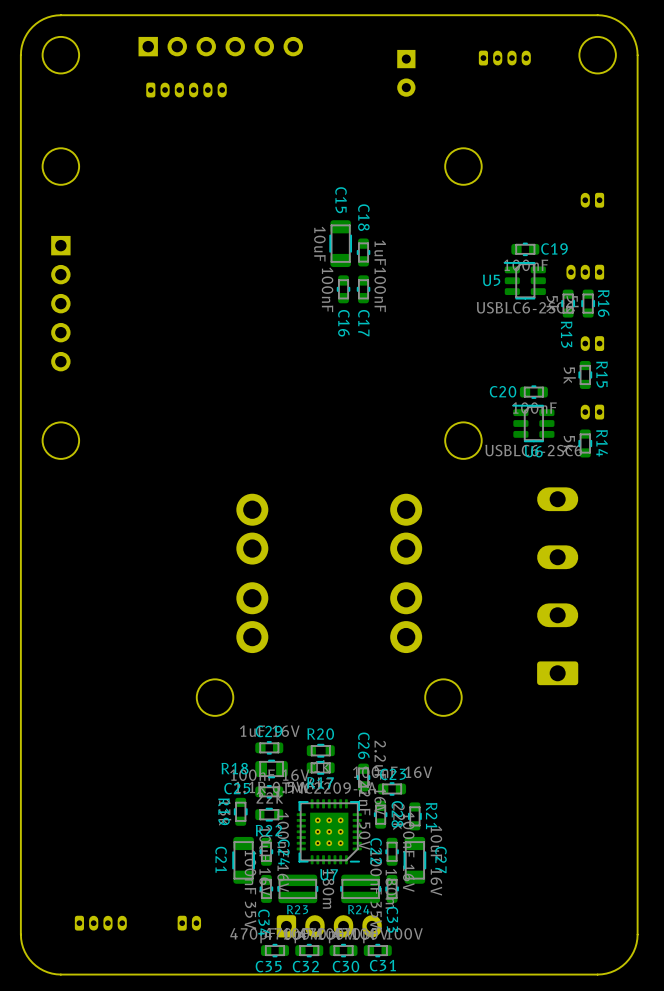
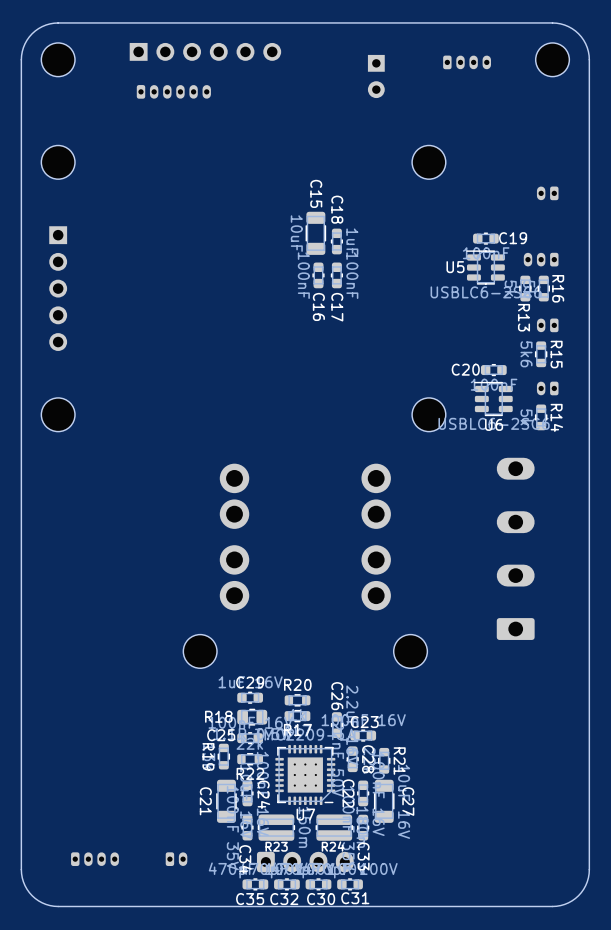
R15 value: 5k (569, 375) -> 5k6 (526, 354)
R23 value: 180m (328, 888) -> 150m (304, 827)

